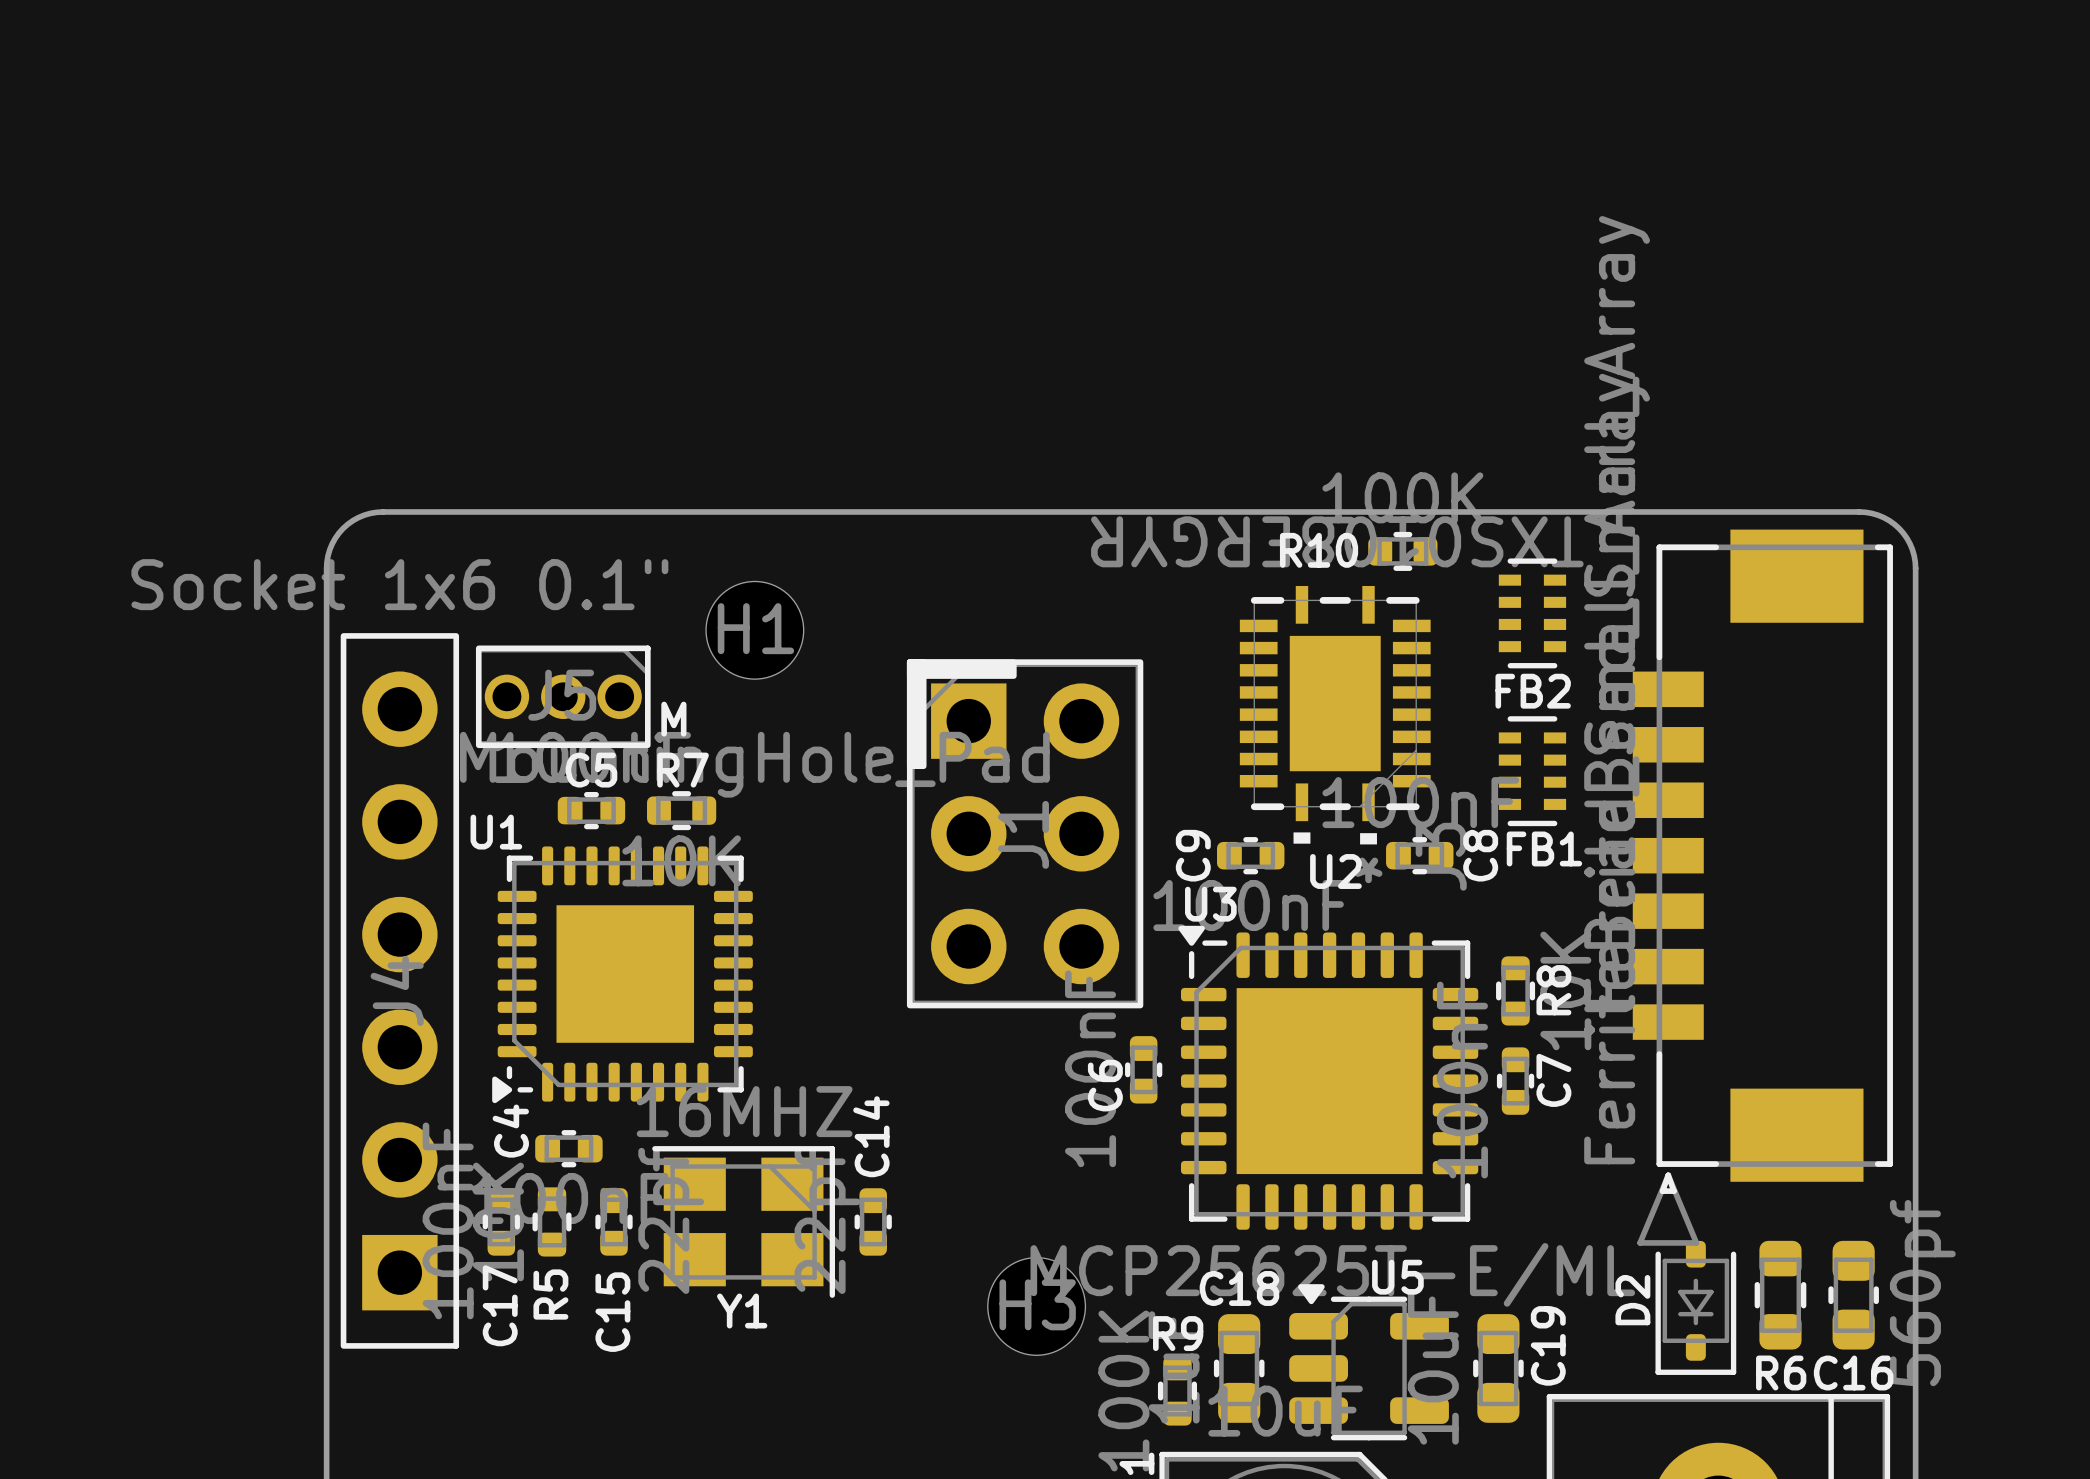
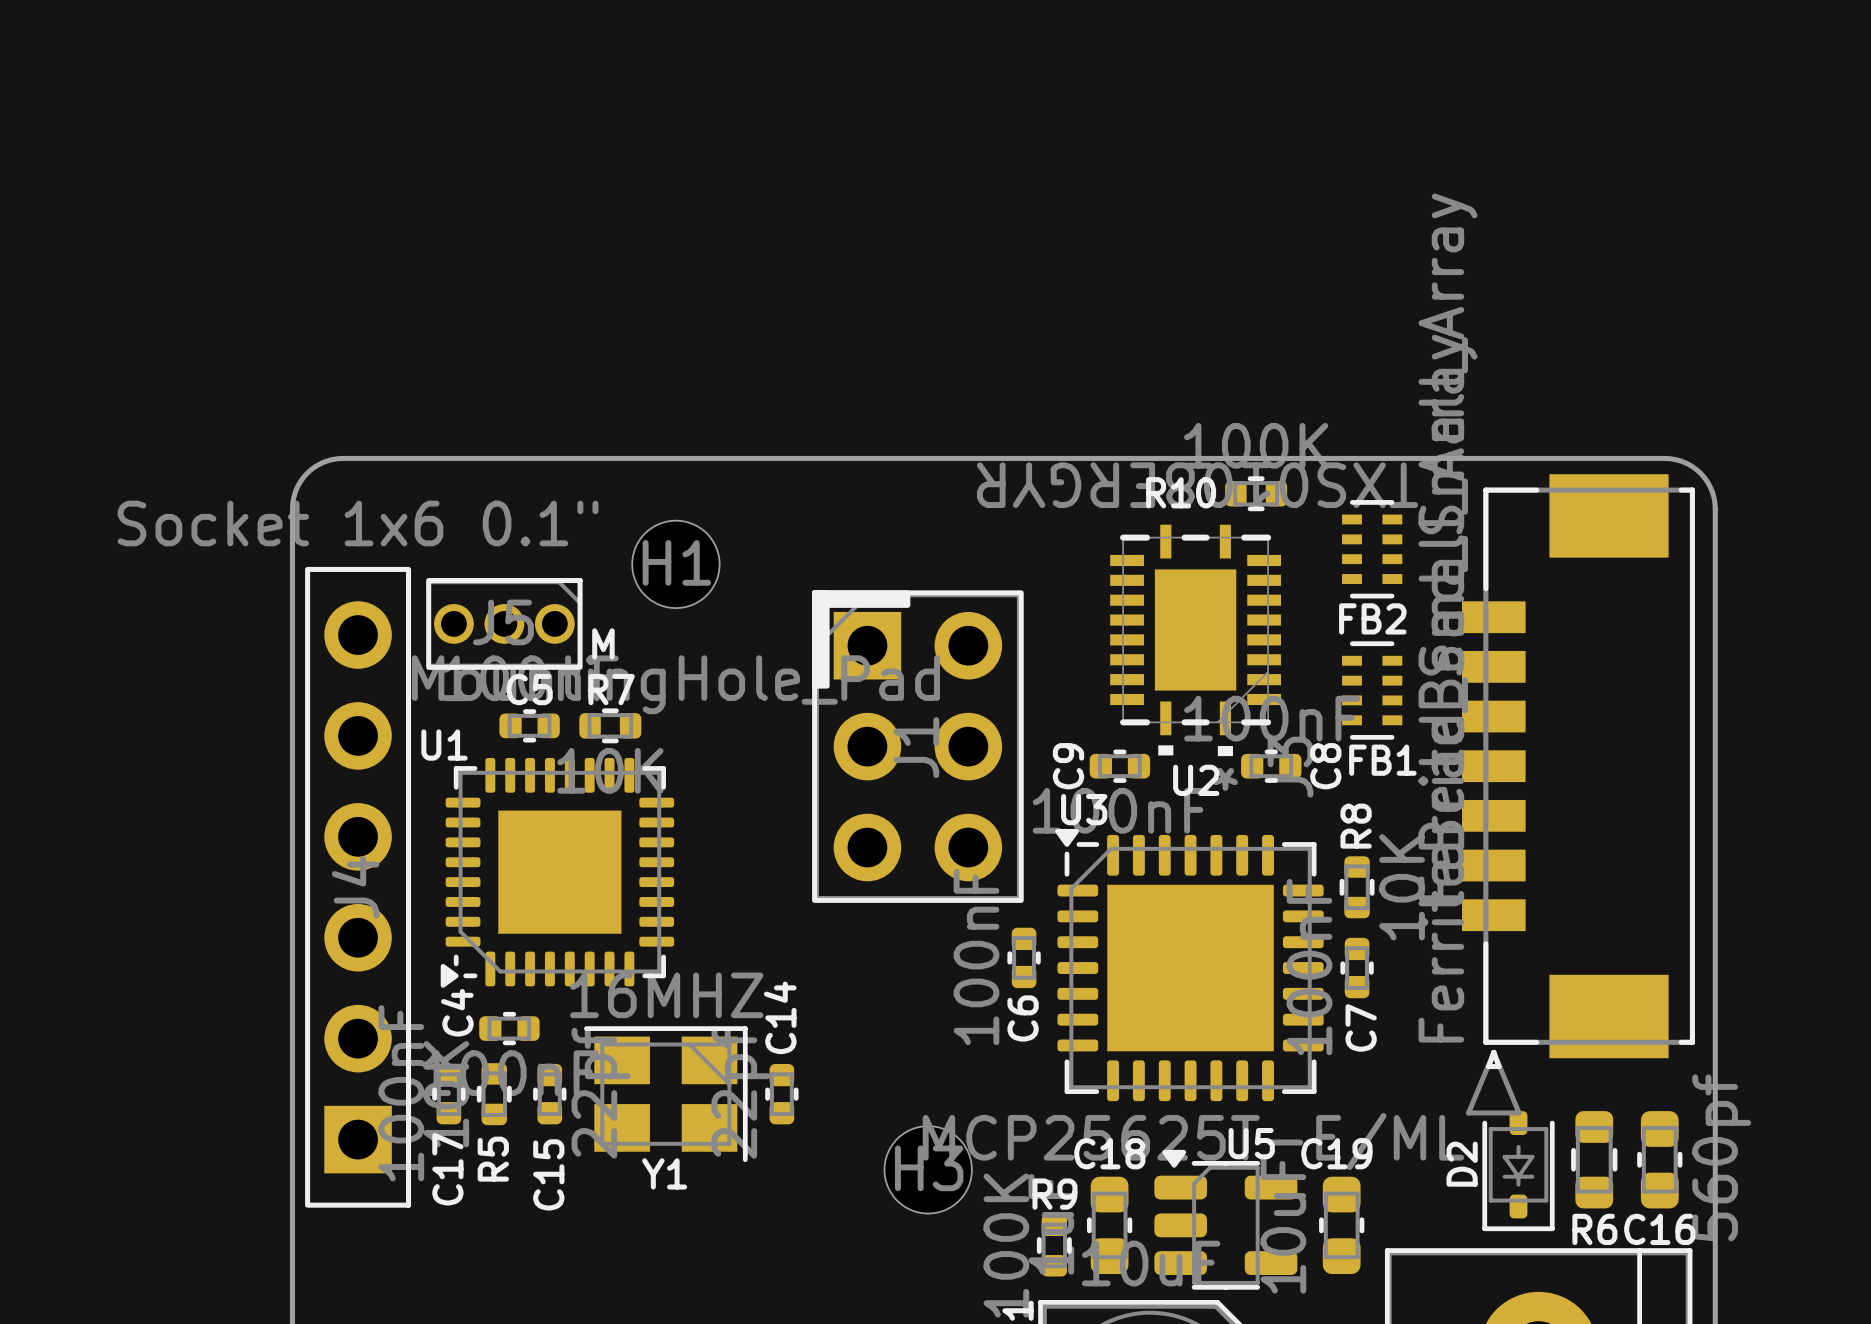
R8 name position: R8 (1553, 990) -> R8 (1356, 826)
C7 name position: C7 (1553, 1080) -> C7 (1361, 1027)
C6 name position: C6 (1105, 1085) -> C6 (1023, 1018)
C19 name rotation: 0° (1548, 1345) -> 90° clockwise (1336, 1153)

